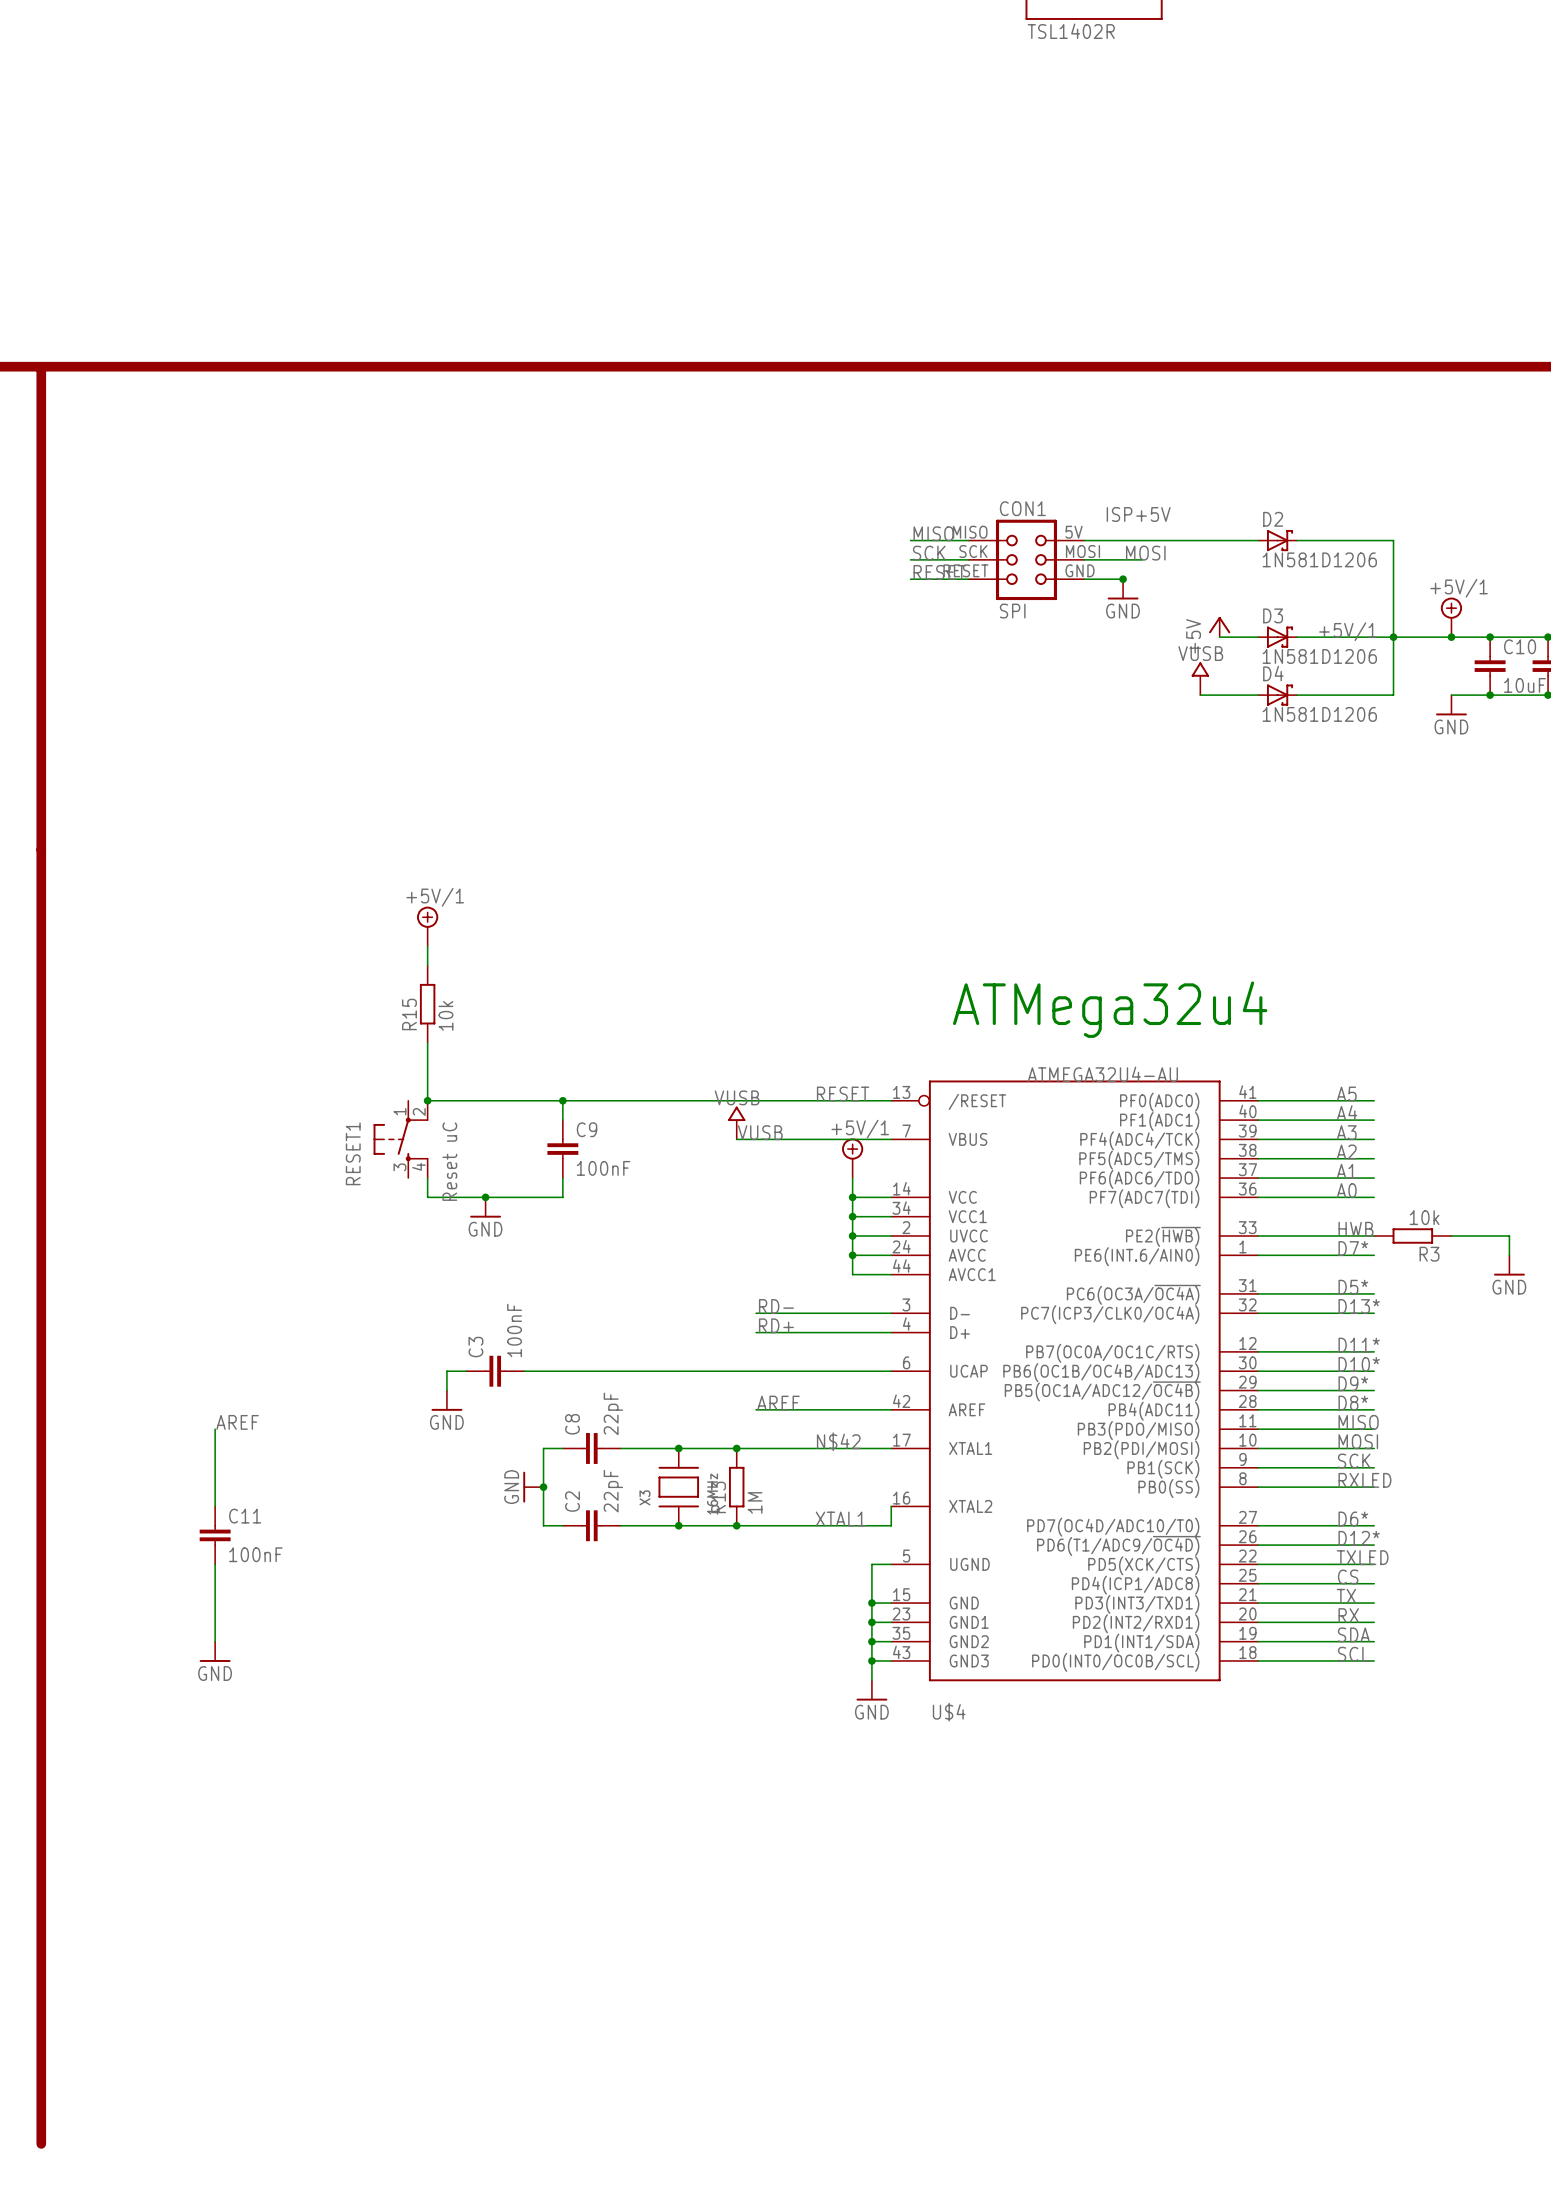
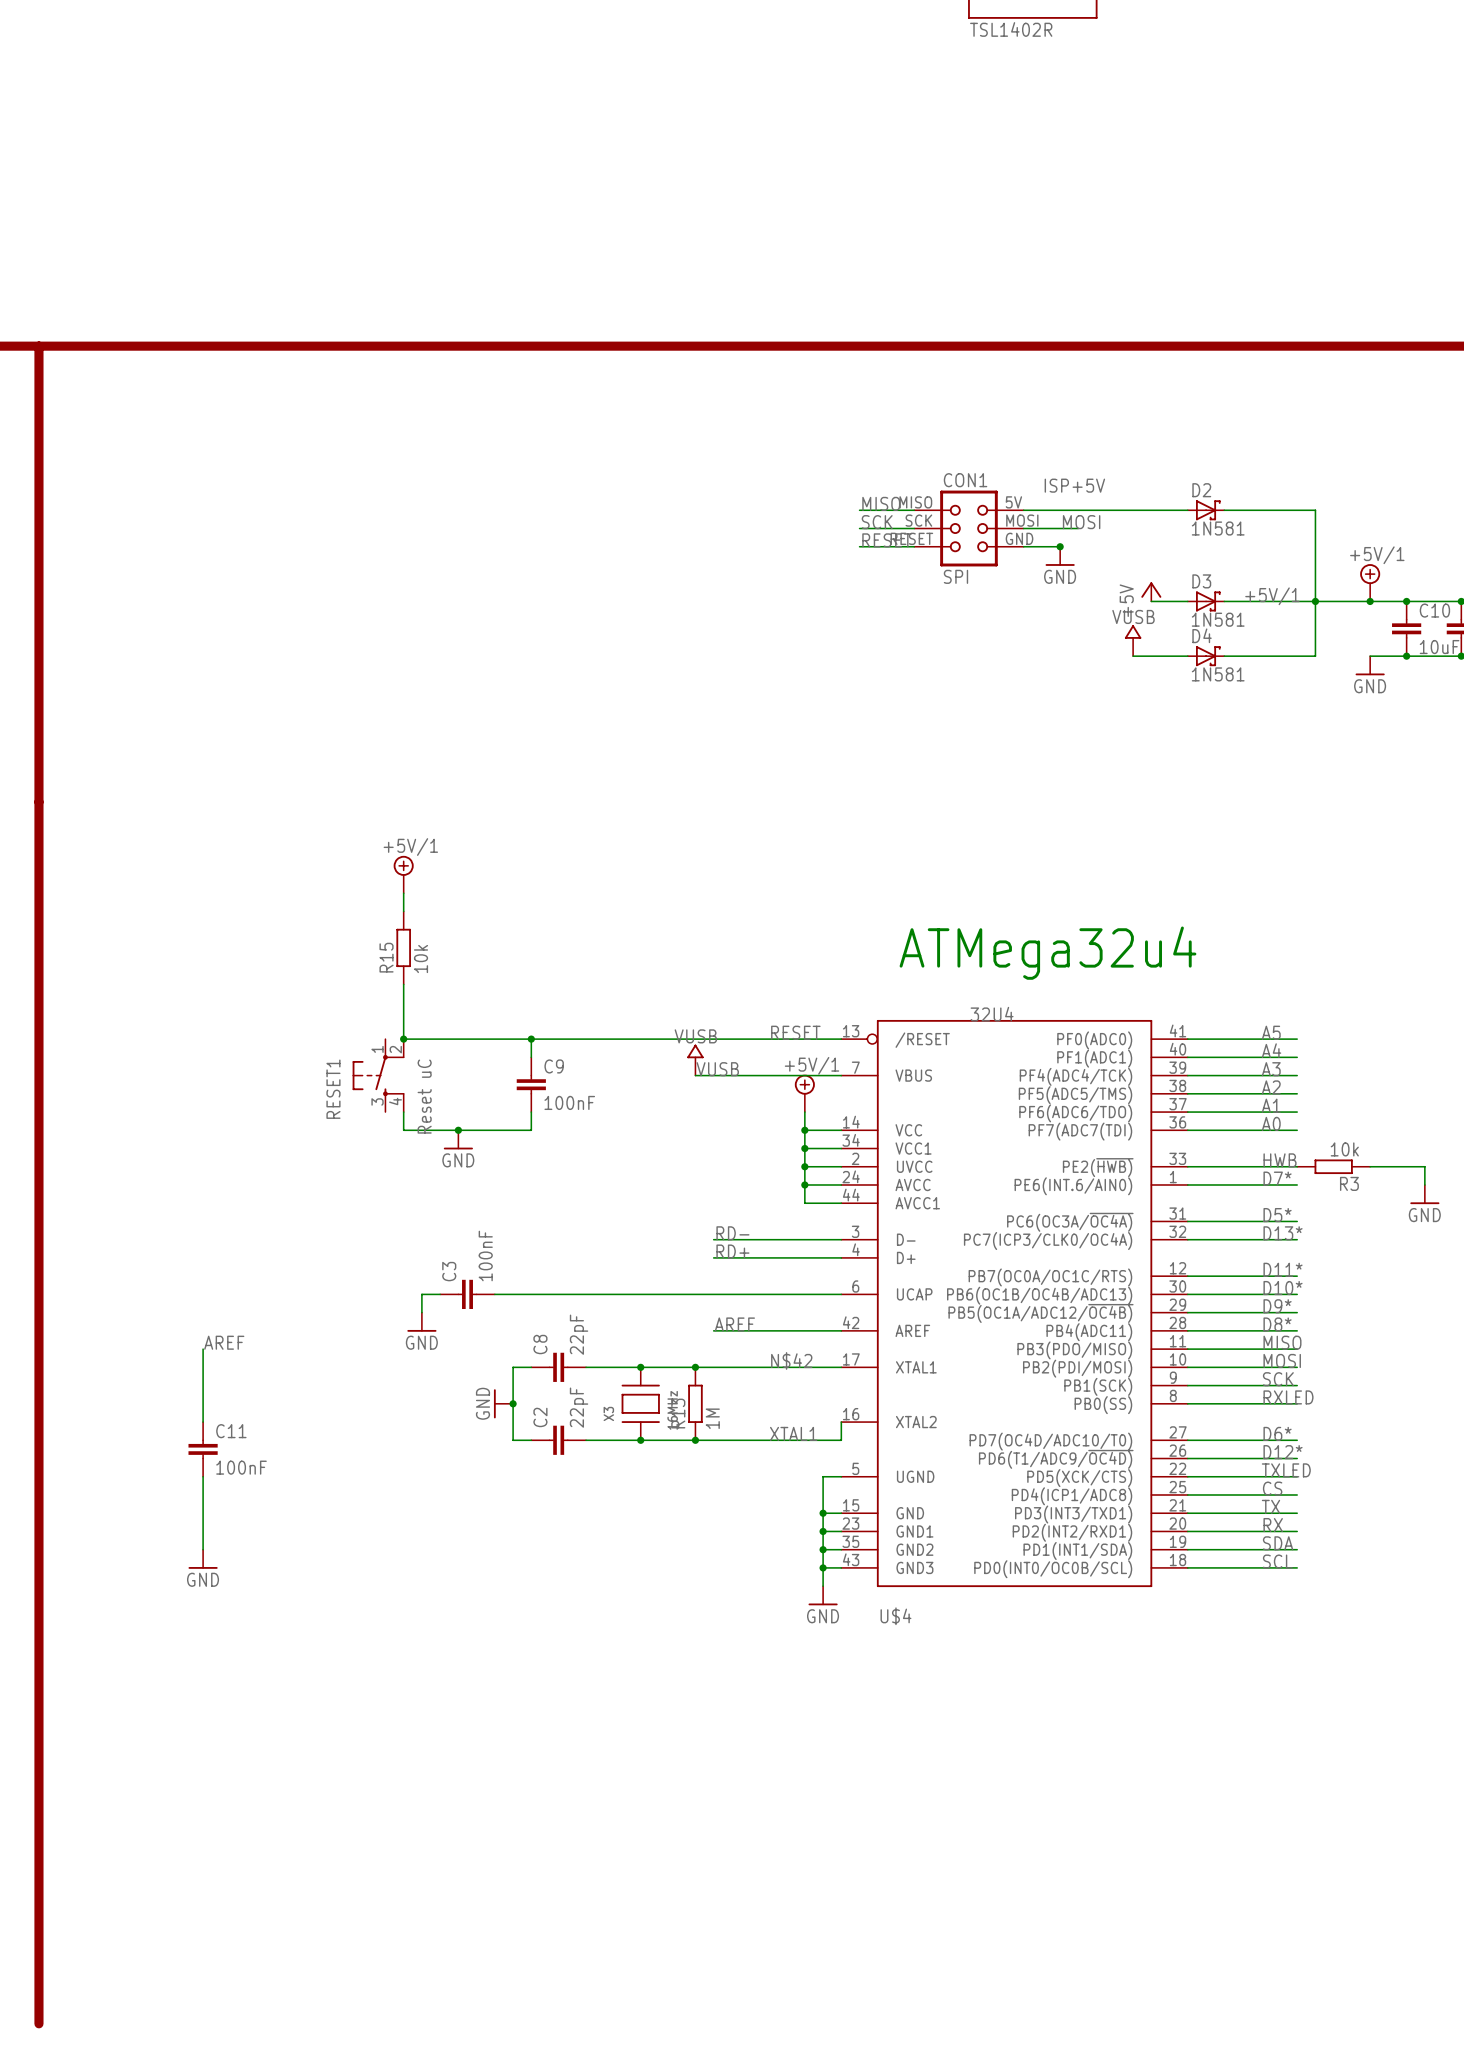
D2 value: 1N581D1206 (1319, 559) -> 1N581 (1218, 528)
D3 value: 1N581D1206 (1319, 656) -> 1N581 (1218, 619)
D4 value: 1N581D1206 (1319, 714) -> 1N581 (1218, 674)
U$4 value: ATMEGA32U4-AU (1102, 1074) -> 32U4 (992, 1014)

